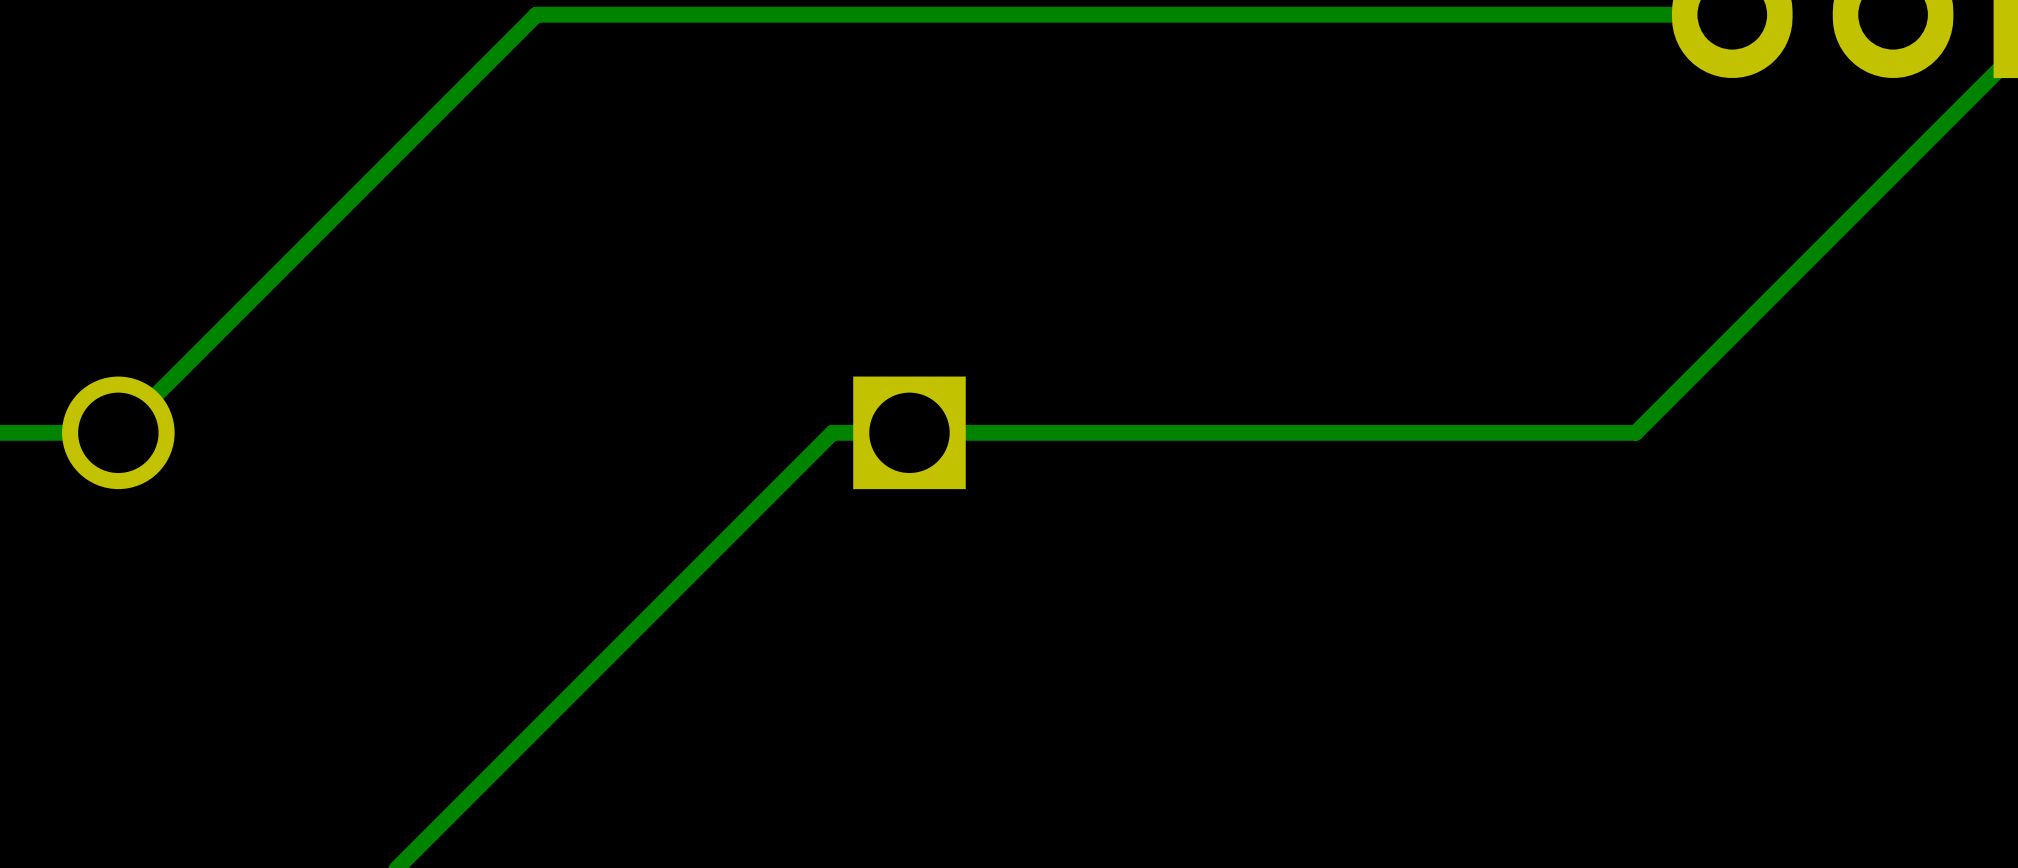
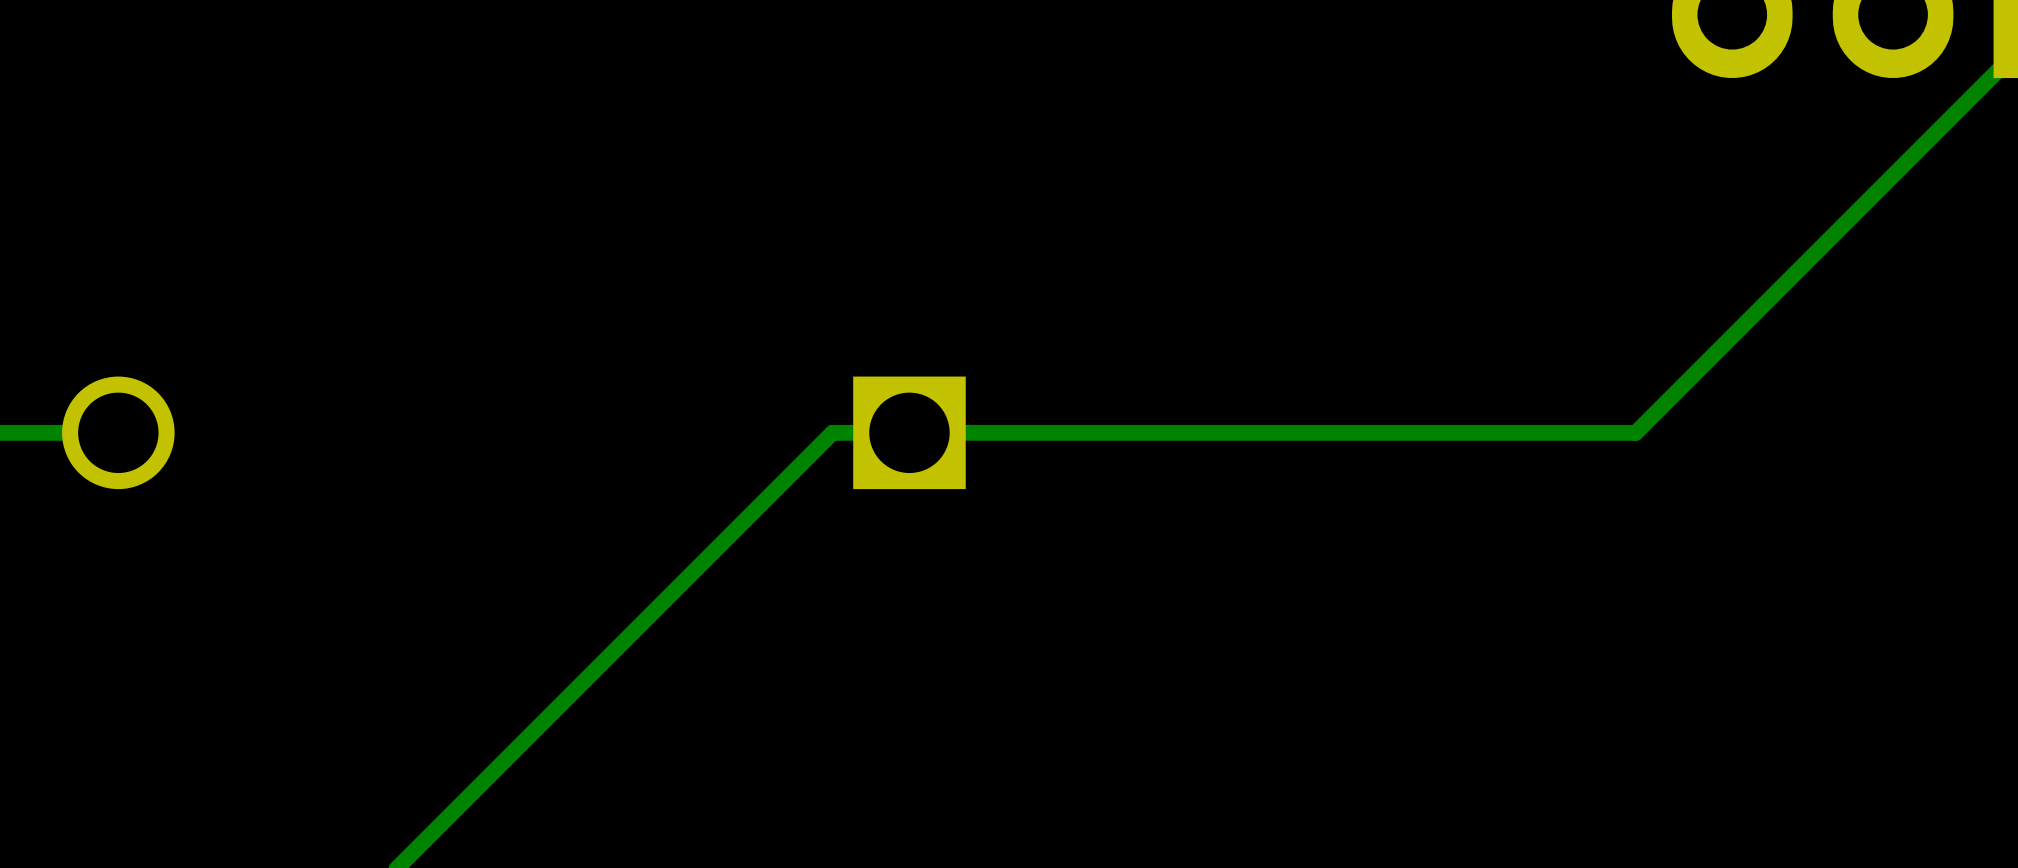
track: (1732, 14) (536, 14) (118, 432) -> none

